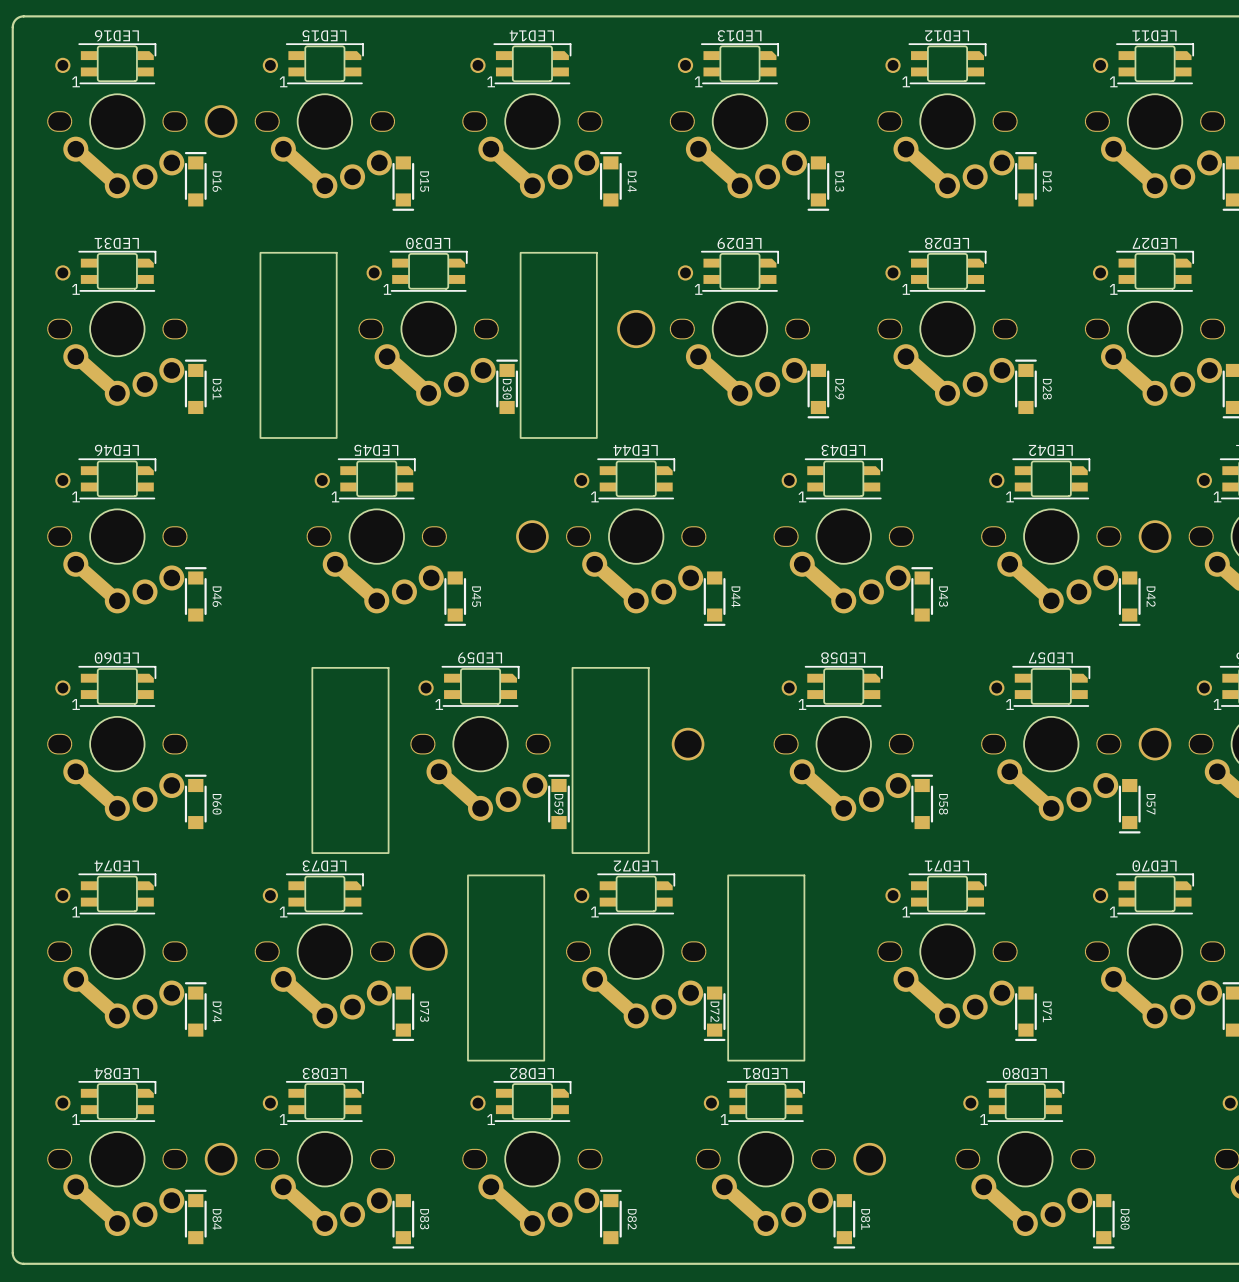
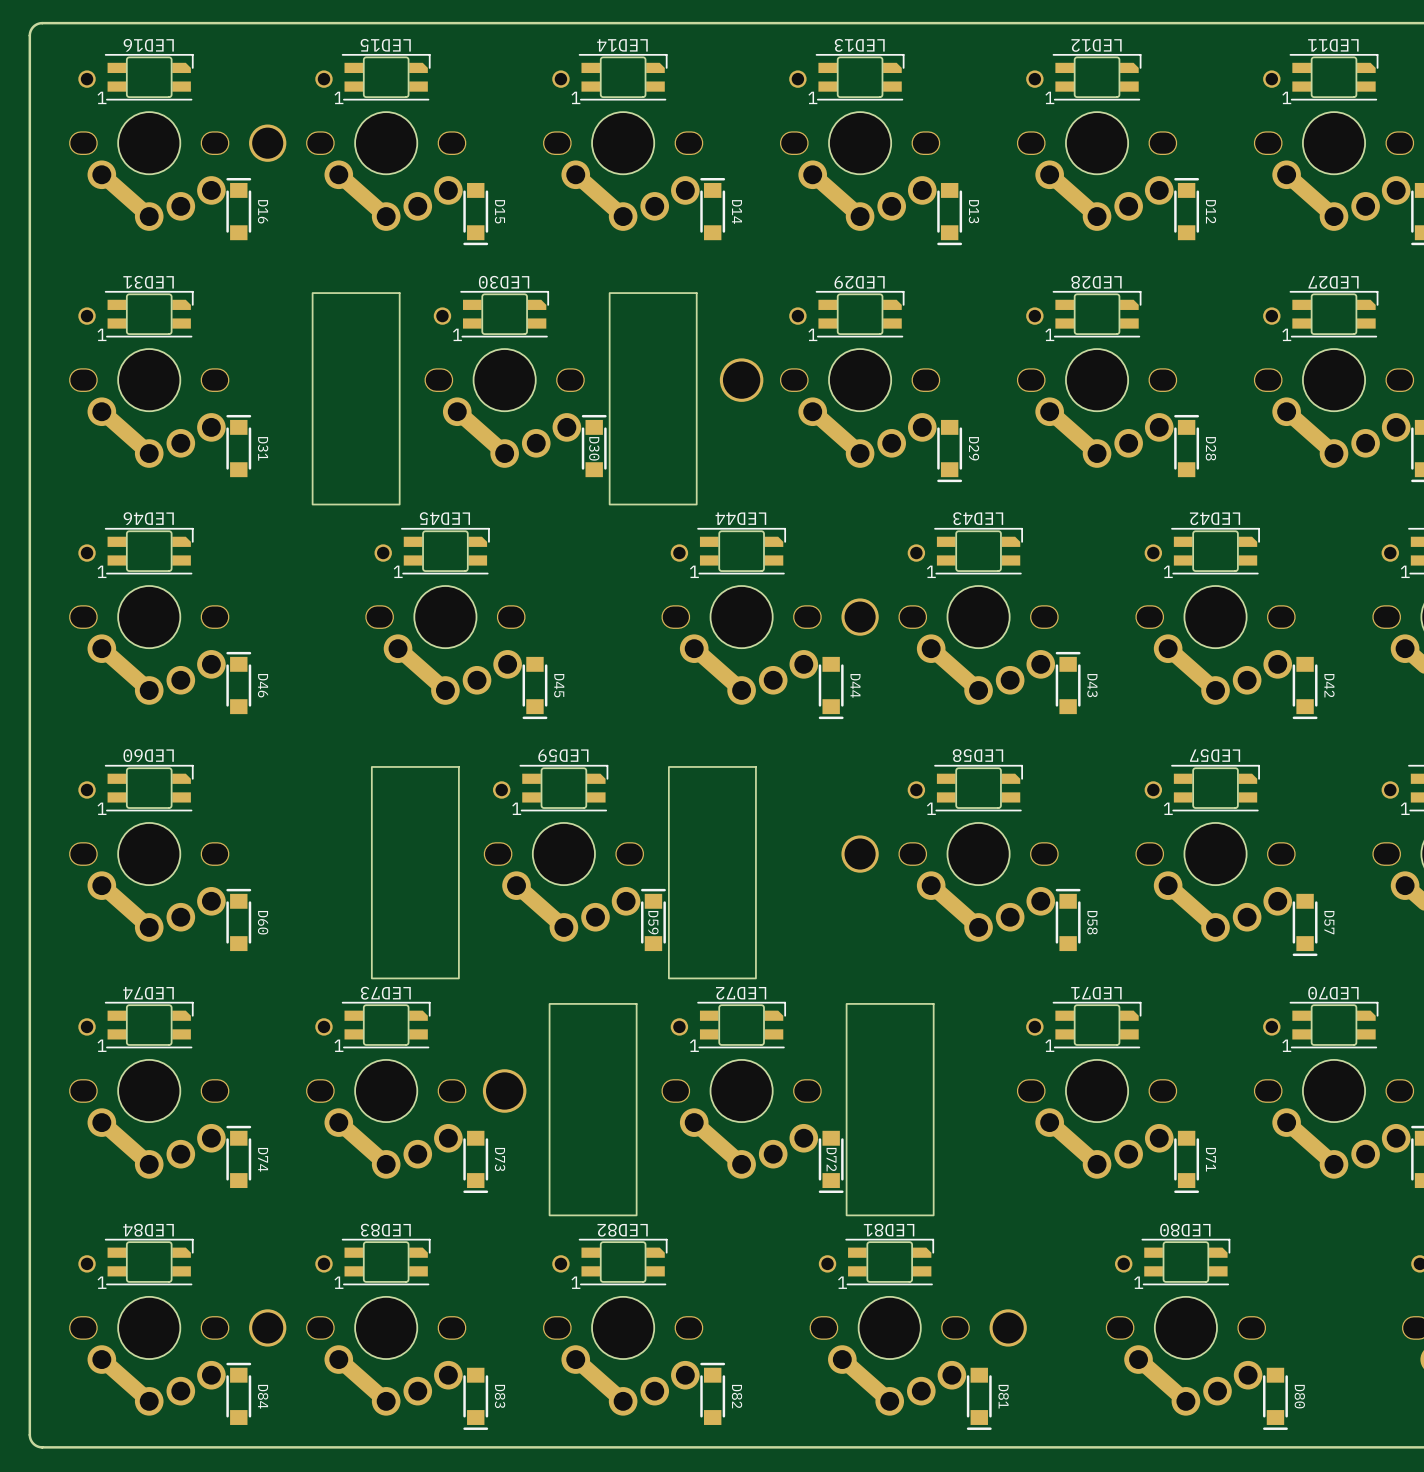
part: (532, 536) -> none
part: none -> (860, 617)
part: (1155, 536) -> none
part position: (688, 744) -> (860, 854)
part: (1155, 744) -> none

